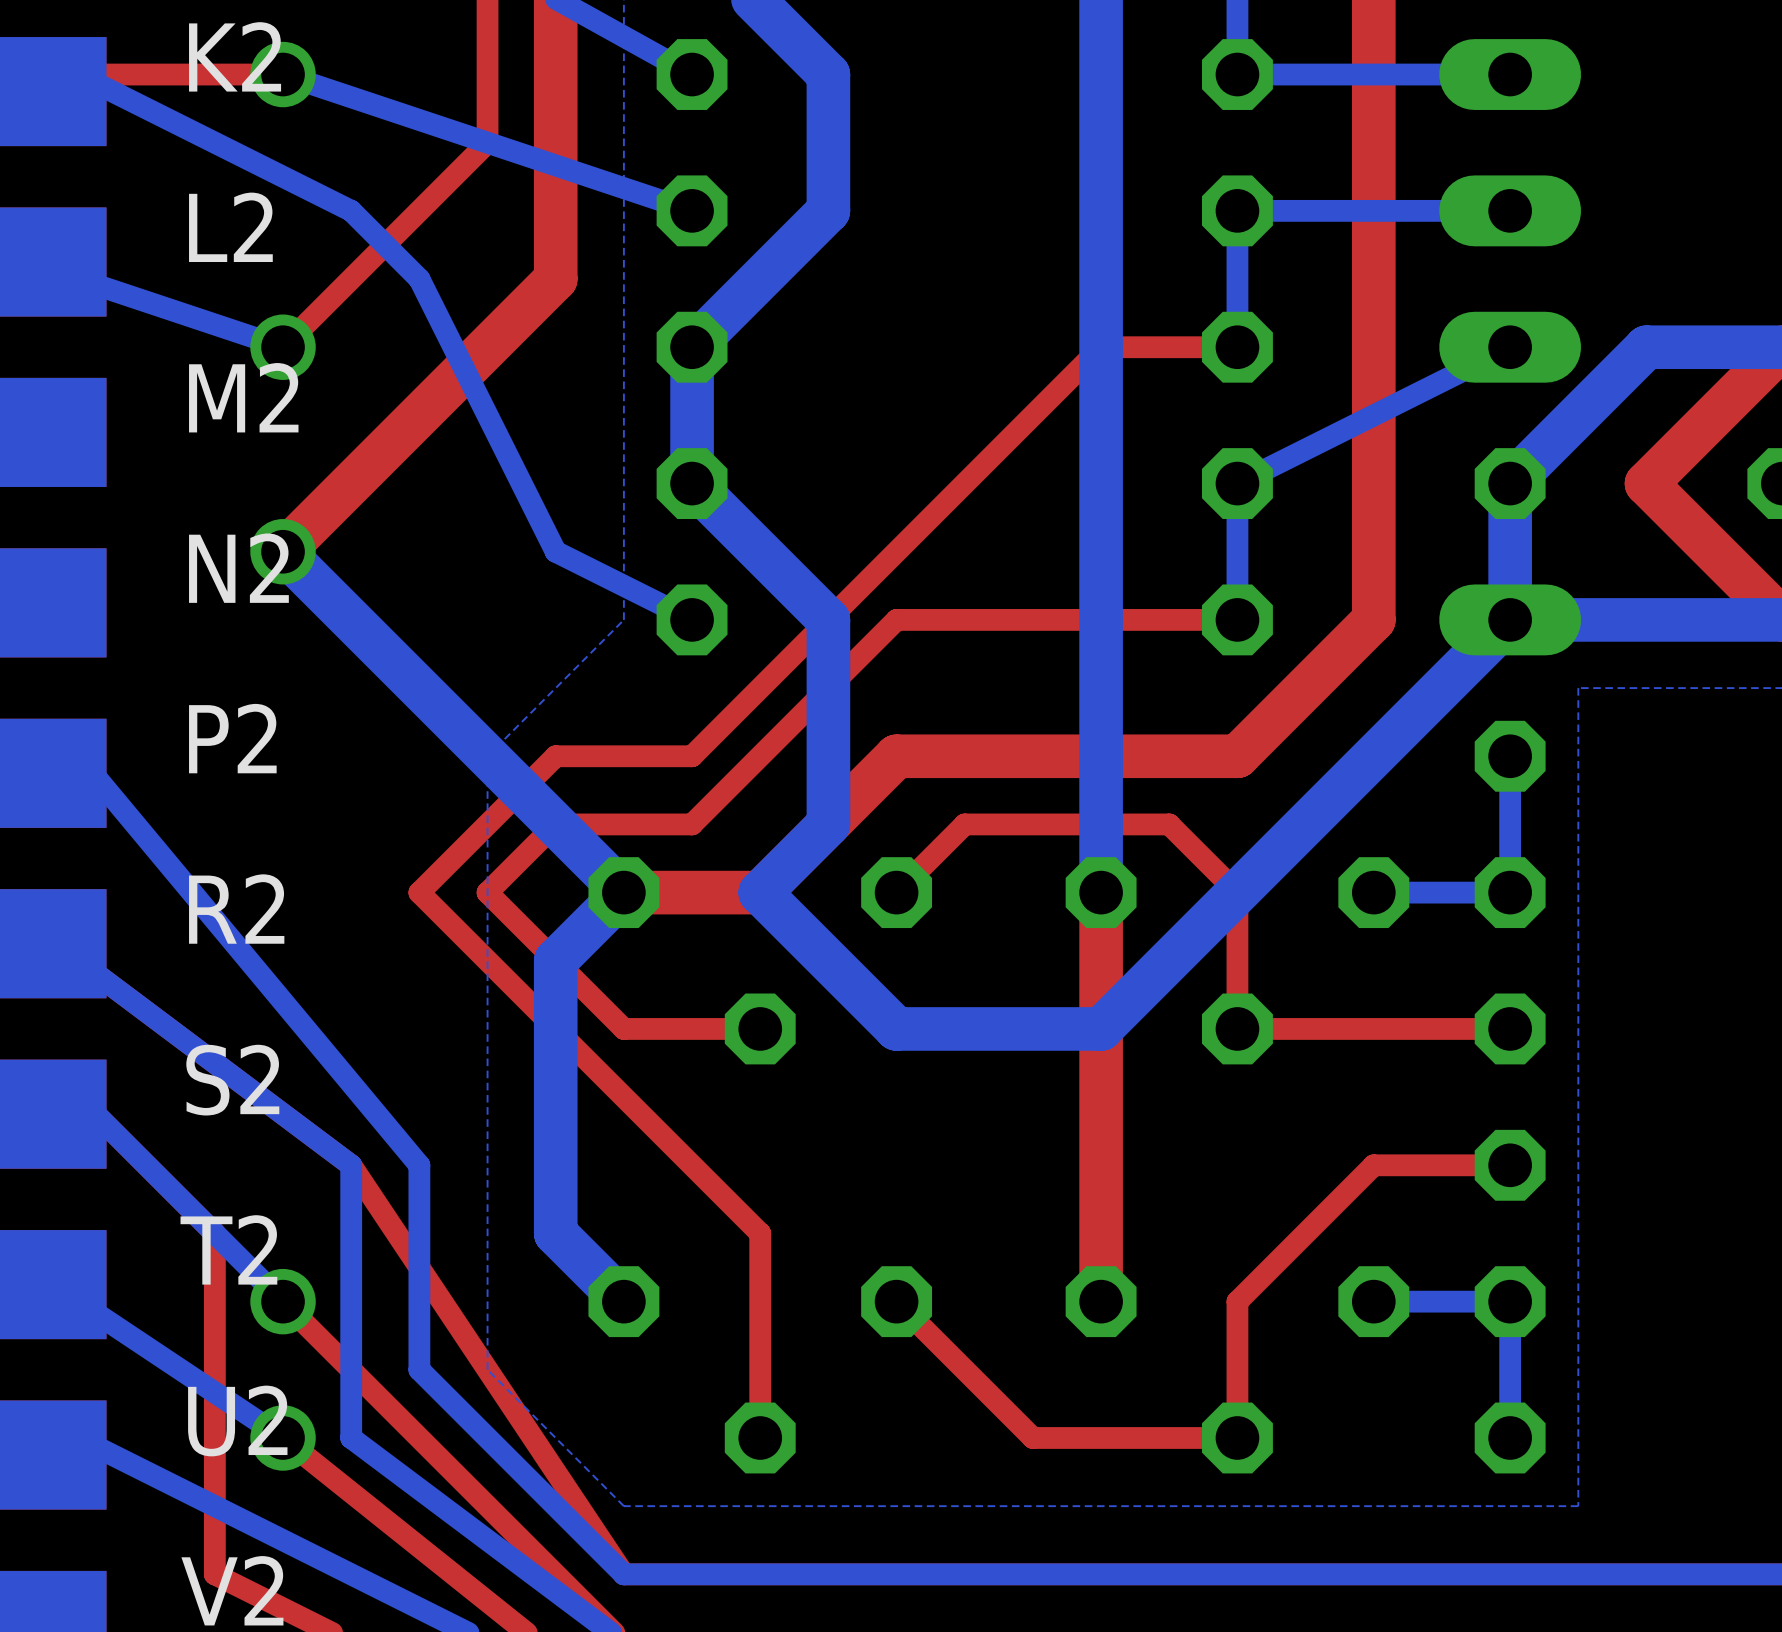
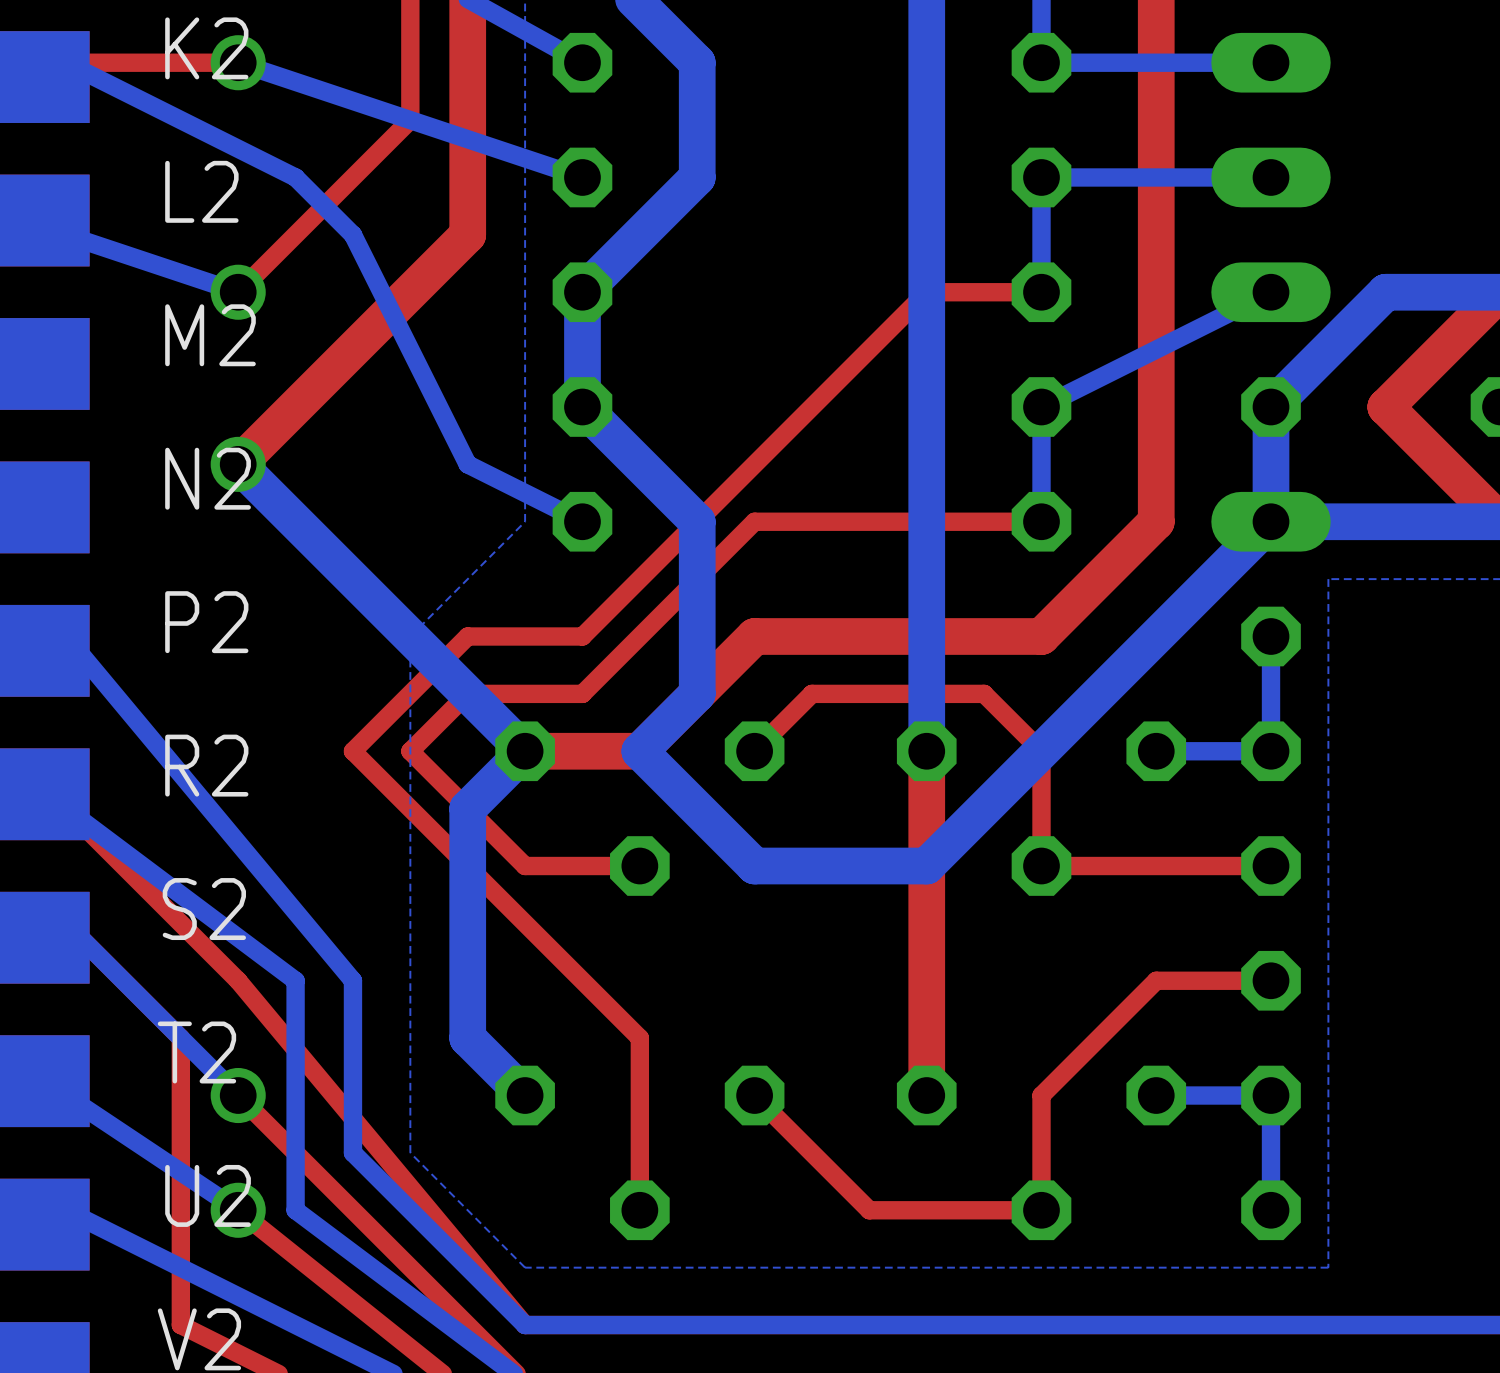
top track: (78, 960) (351, 1165) (623, 1574) -> (66, 808) (238, 980) (525, 1325)

